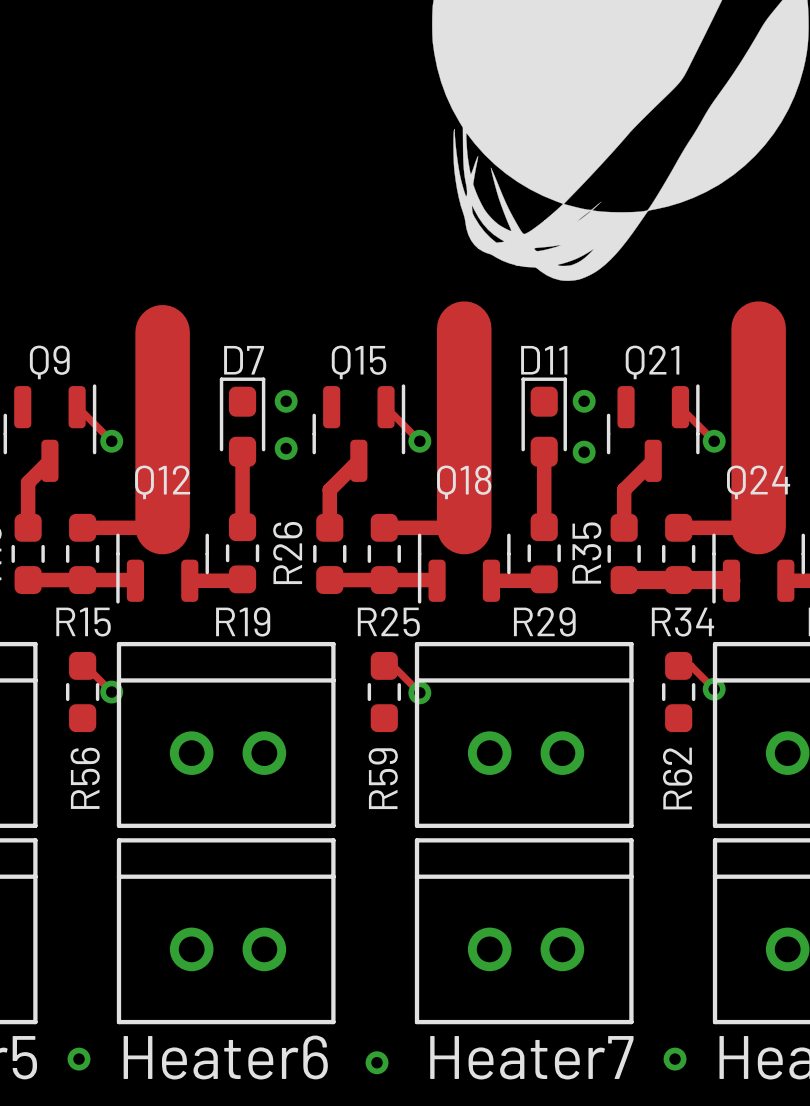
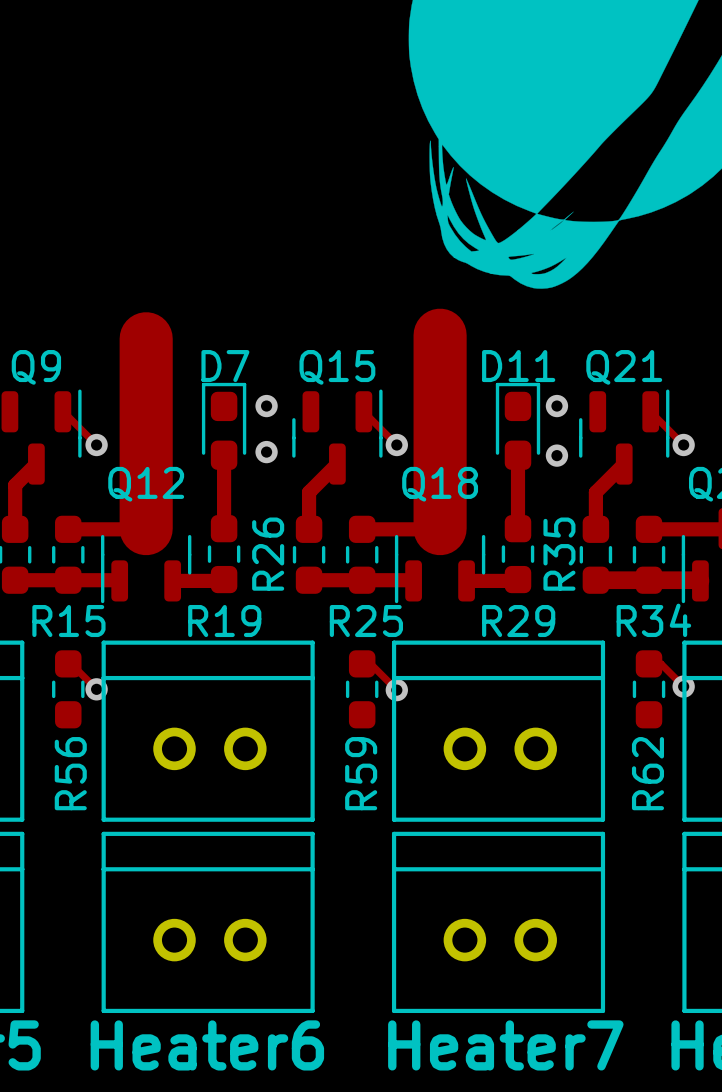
via: (79, 1059) -> none
via: (675, 1059) -> none
via: (377, 1062) -> none

